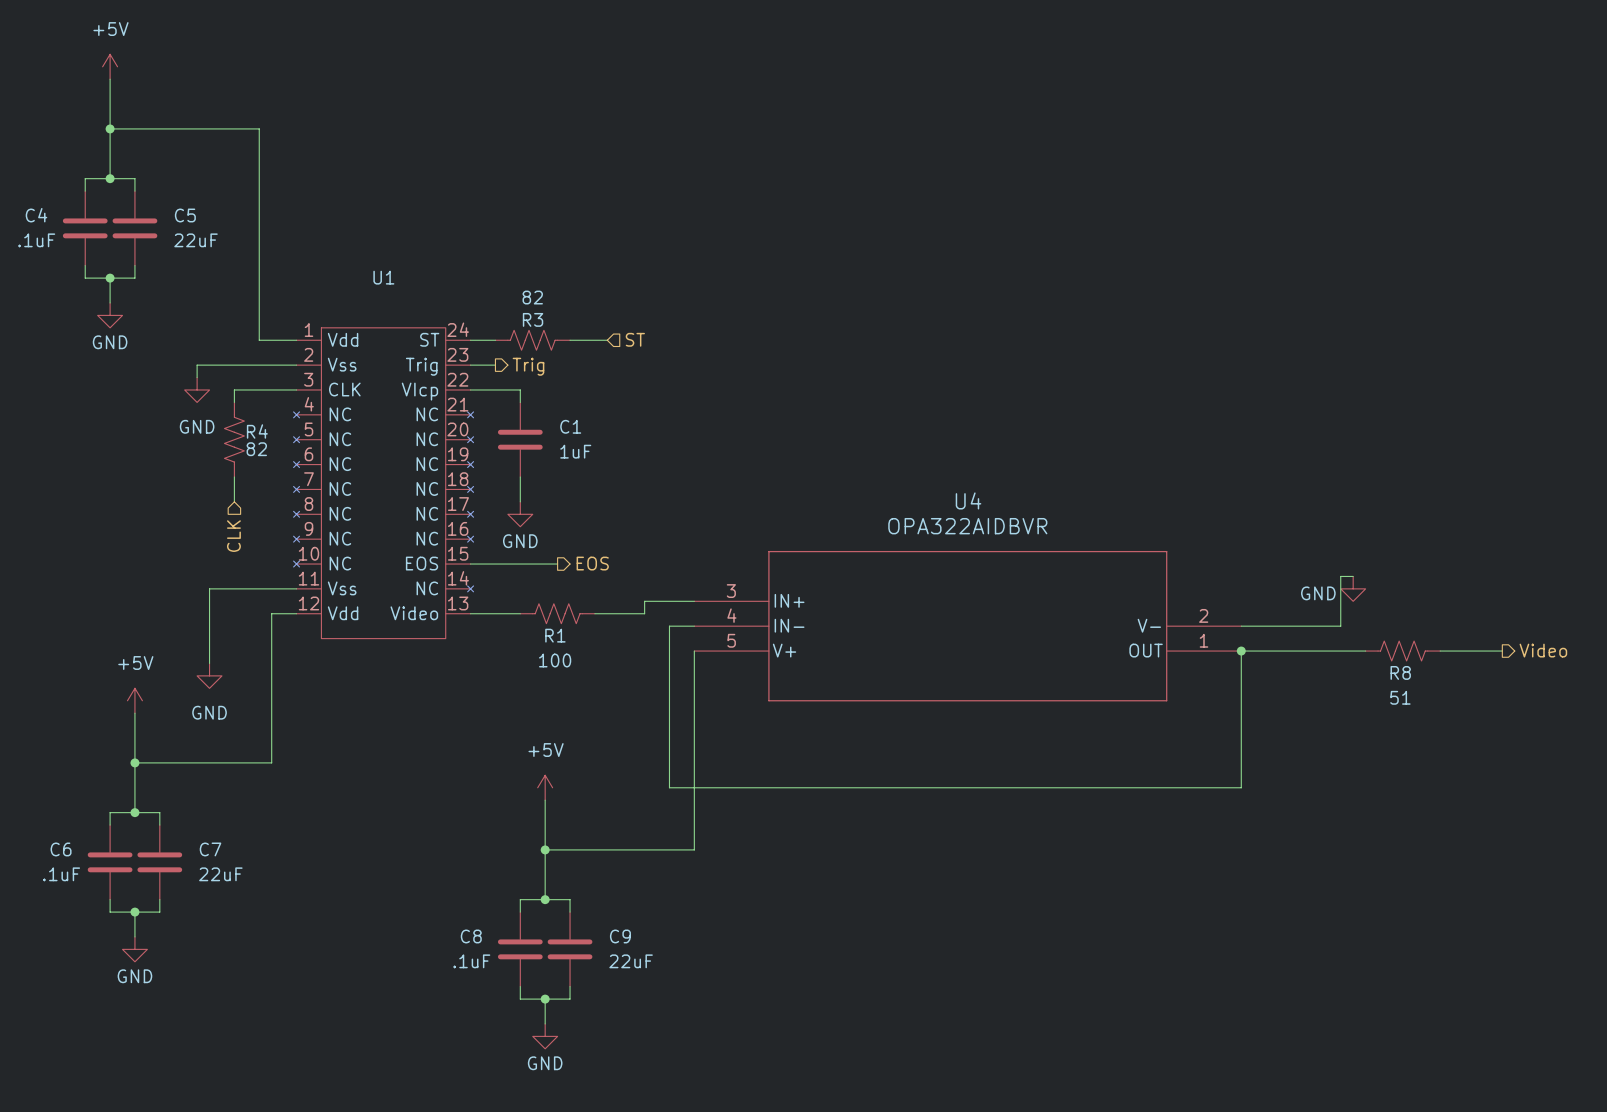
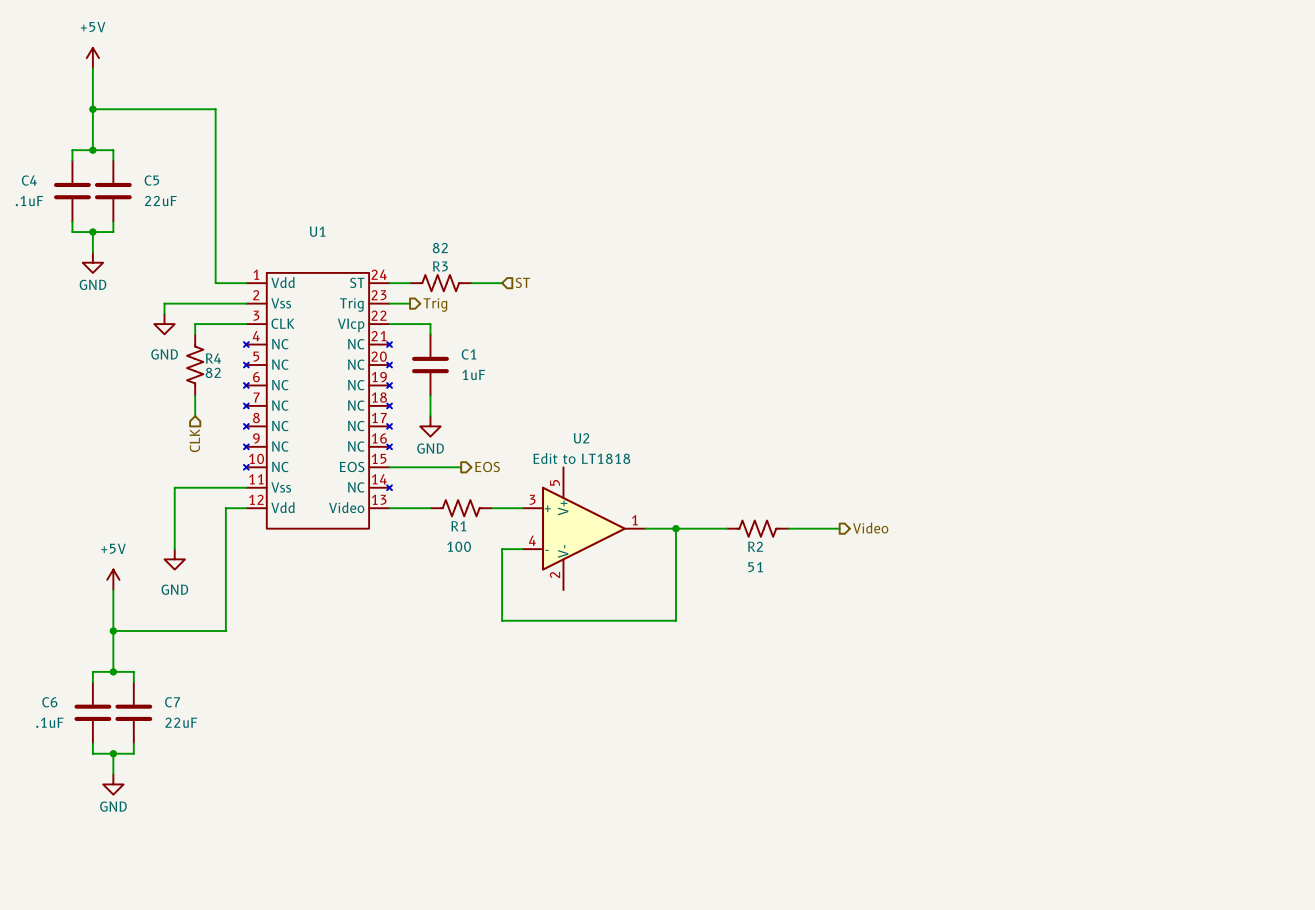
wire: (1353, 576) (1340, 576) (1340, 626) (1241, 626) -> none
power symbol: GND (1353, 588) -> none
wire: (694, 626) (669, 626) (669, 787) (1241, 787) (1241, 651) (1365, 651) -> none
U4: OPA322AIDBVR (967, 626) -> none
U2: none -> Edit to LT1818 (583, 528)
wire: none -> (645, 528) (727, 528)
wire: none -> (675, 528) (675, 620) (502, 620) (502, 549) (522, 549)
junction: none -> (675, 528)
R2: none -> 51 (757, 528)
wire: none -> (788, 528) (839, 528)
hierarchical label: none -> Video (870, 528)
hierarchical label: Video (1543, 650) -> none
wire: (694, 651) (694, 849) (545, 849) -> none
junction: (1241, 651) -> none
R8: 51 (1402, 651) -> none
wire: (1440, 651) (1502, 651) -> none
power symbol: +5V (545, 787) -> none
wire: (545, 800) (545, 899) -> none
junction: (545, 849) -> none
junction: (545, 899) -> none
wire: (520, 912) (520, 899) (570, 899) (570, 912) -> none
C8: .1uF (520, 949) -> none
C9: 22uF (570, 949) -> none
wire: (520, 986) (520, 999) (570, 999) (570, 986) -> none
wire: (545, 999) (545, 1023) -> none
junction: (545, 999) -> none
power symbol: GND (545, 1036) -> none

